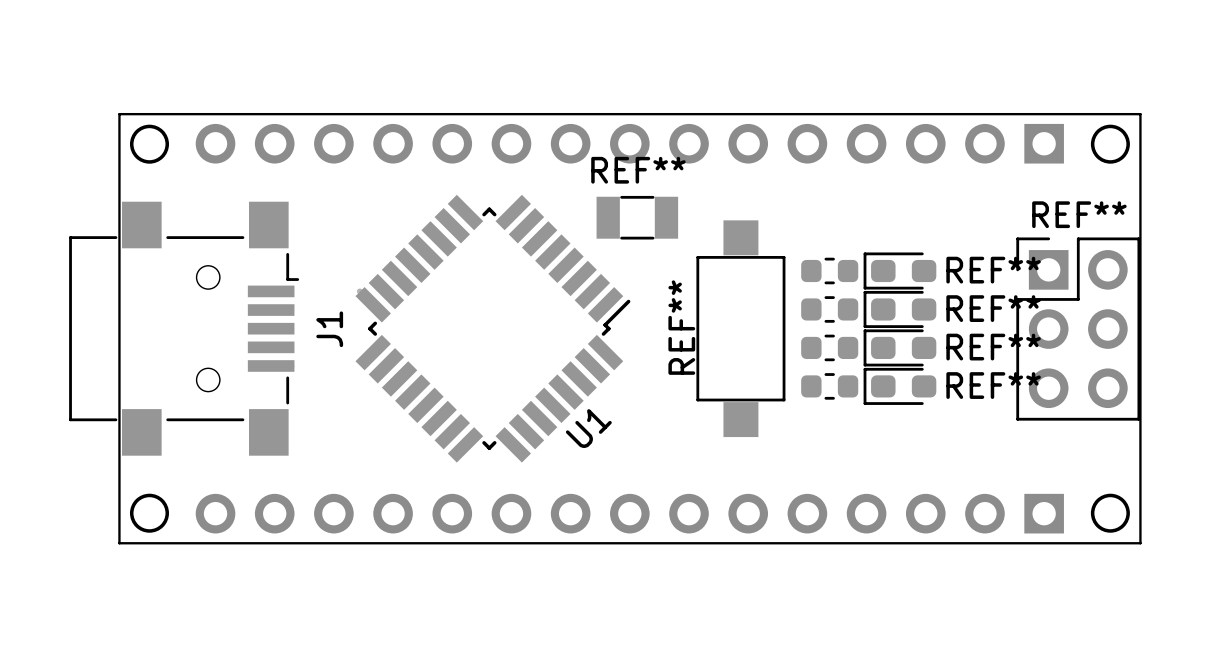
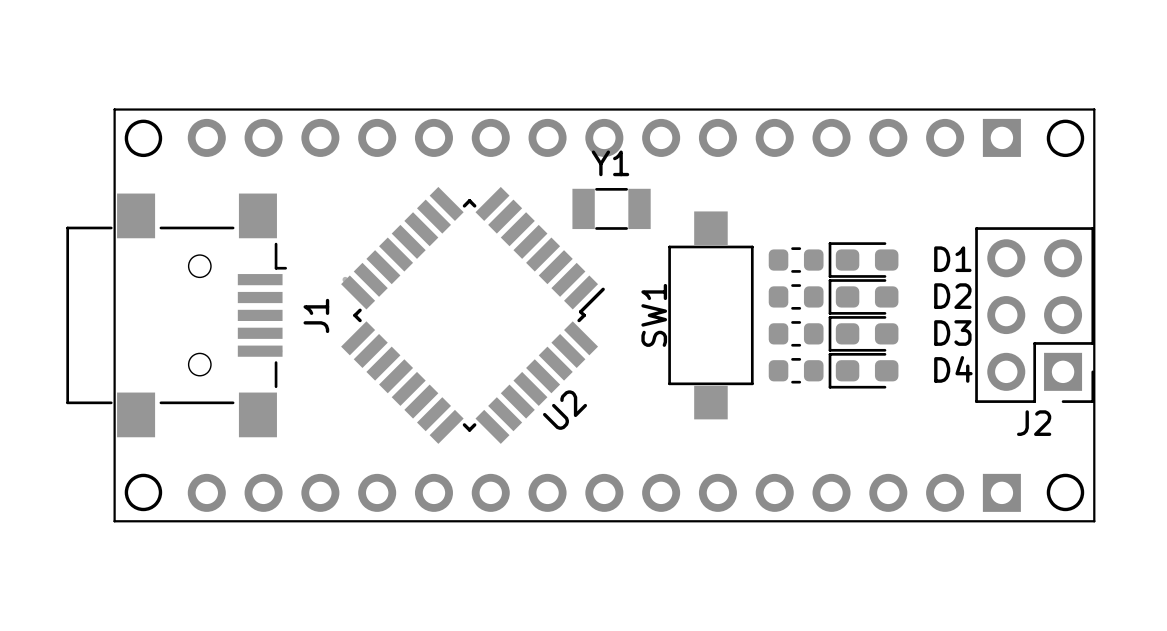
REF** name: REF** (638, 170) -> Y1 (610, 163)
REF** name: REF** (993, 270) -> D1 (952, 259)
REF** name: REF** (993, 308) -> D2 (952, 296)
REF** name: REF** (681, 327) -> SW1 (654, 315)
J2: none -> (1034, 315)
REF**: (1078, 329) -> none
REF** name: REF** (993, 347) -> D3 (952, 333)
REF** name: REF** (993, 385) -> D4 (953, 369)
U1 name: U1 (588, 428) -> U2 (565, 410)

